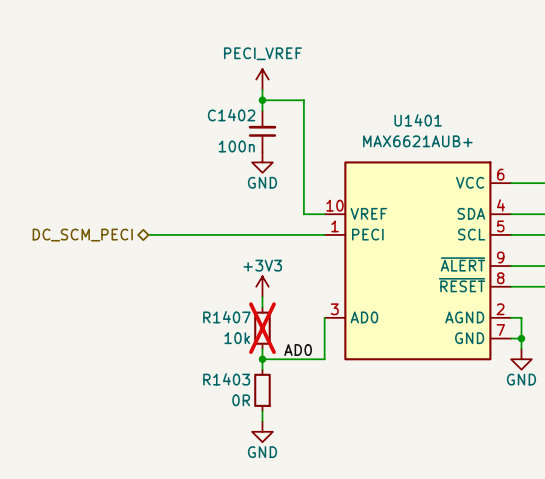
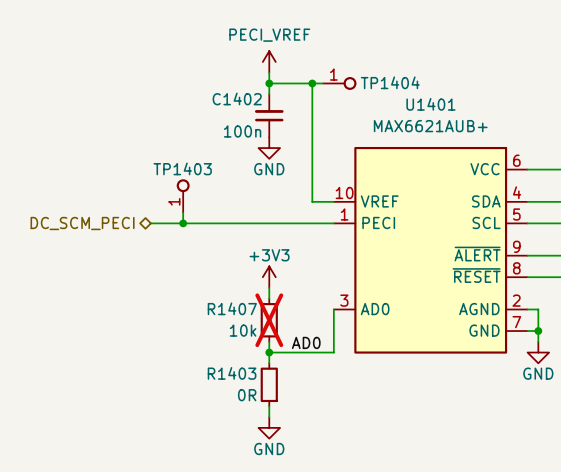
wire: none -> (312, 83) (323, 83)
junction: none -> (312, 83)
TP1404: none -> (339, 83)
TP1403: none -> (183, 195)
wire: none -> (183, 212) (183, 223)
junction: none -> (183, 223)

